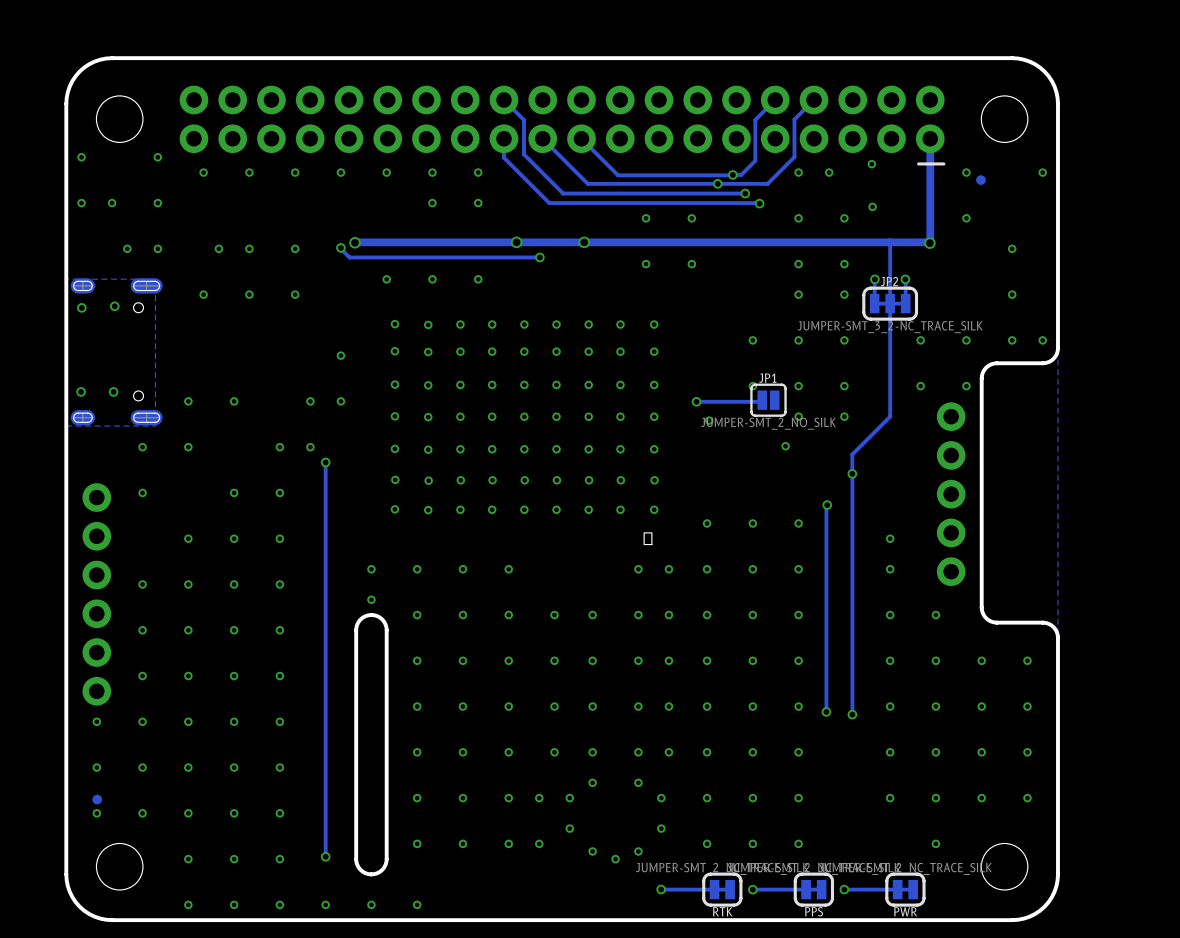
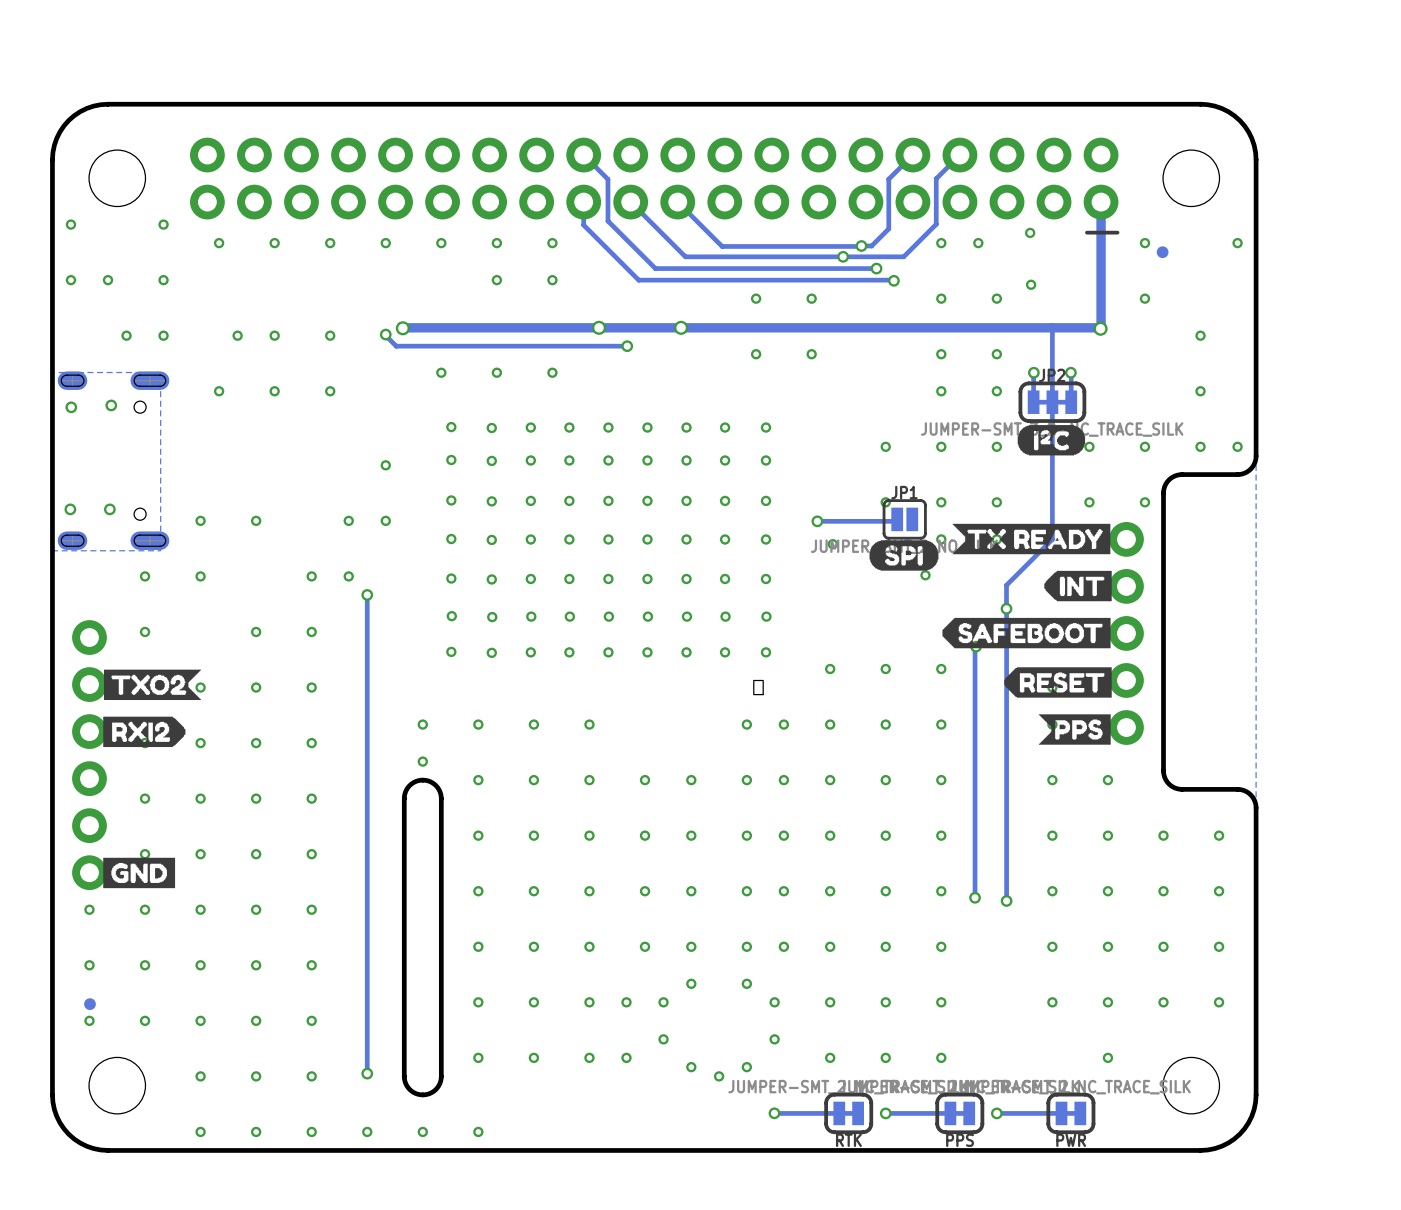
drawing: none -> [1017, 425, 1086, 456]
drawing: none -> [869, 523, 1112, 745]
drawing: none -> [103, 669, 202, 748]
drawing: none -> [103, 857, 176, 889]

